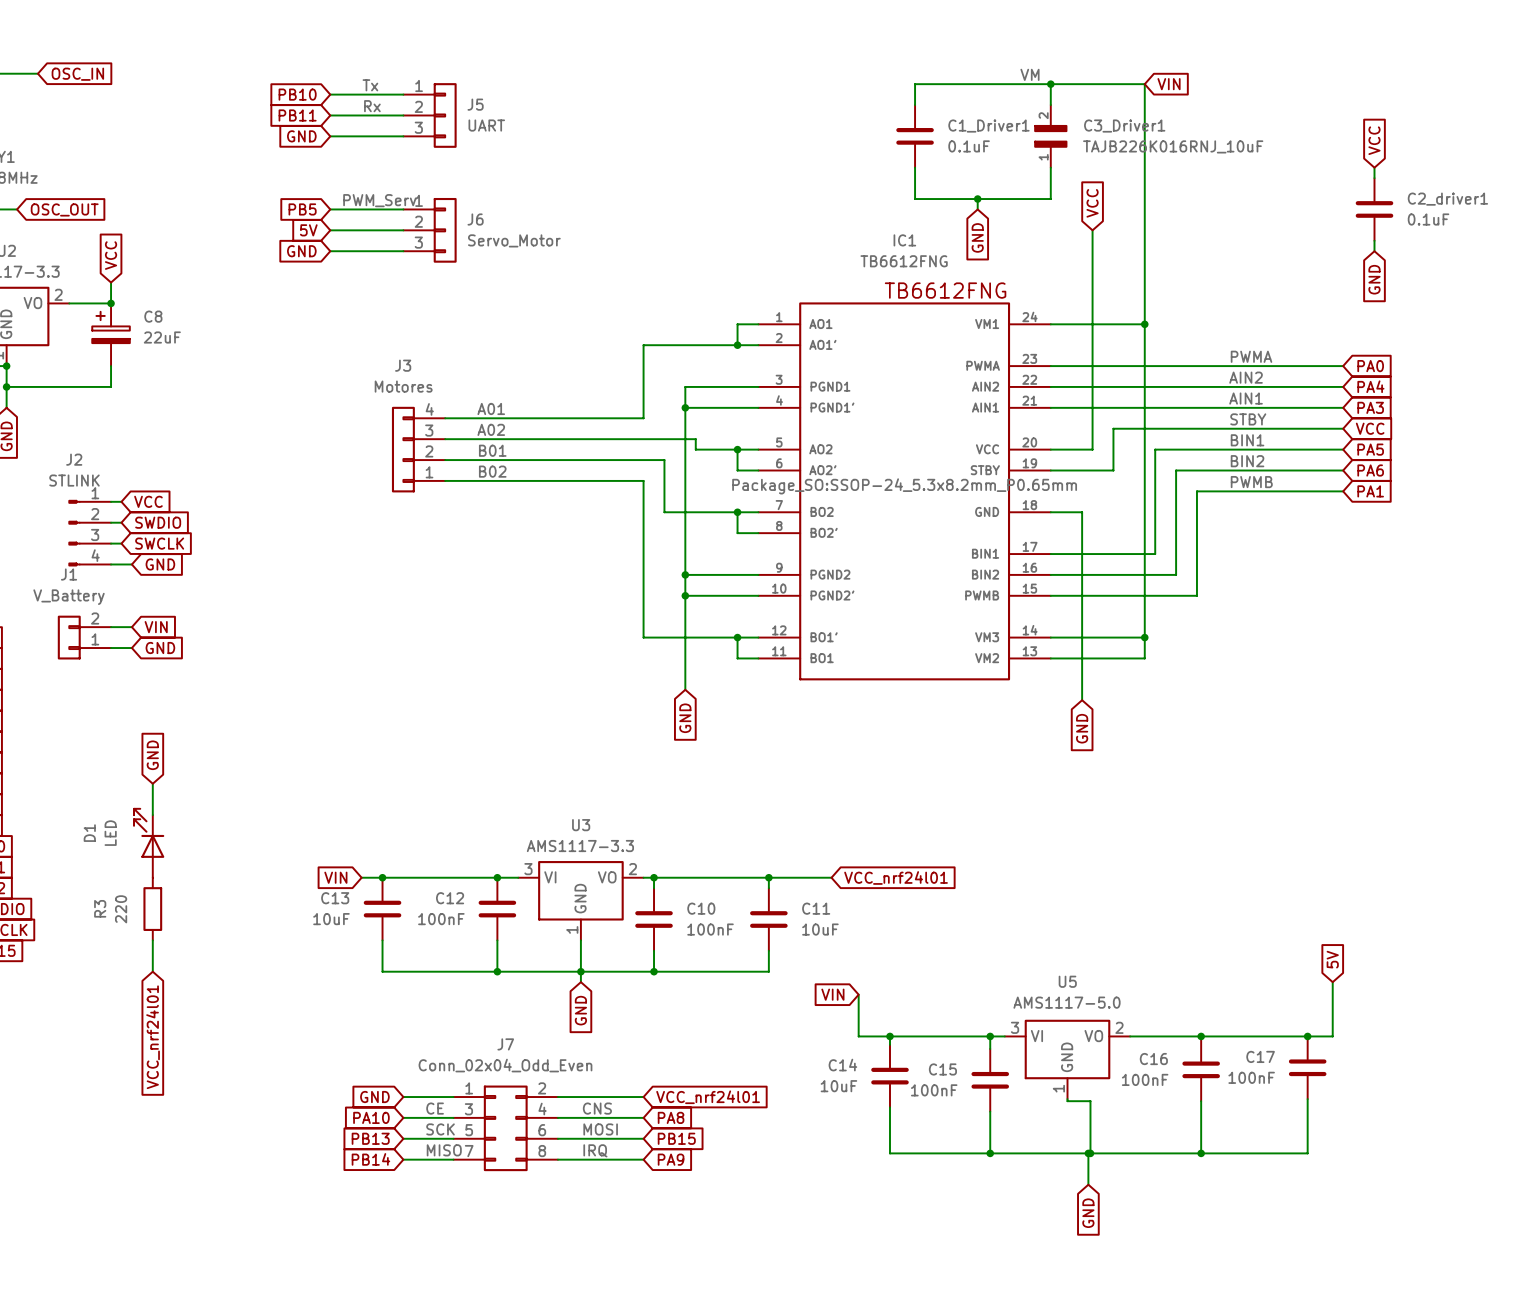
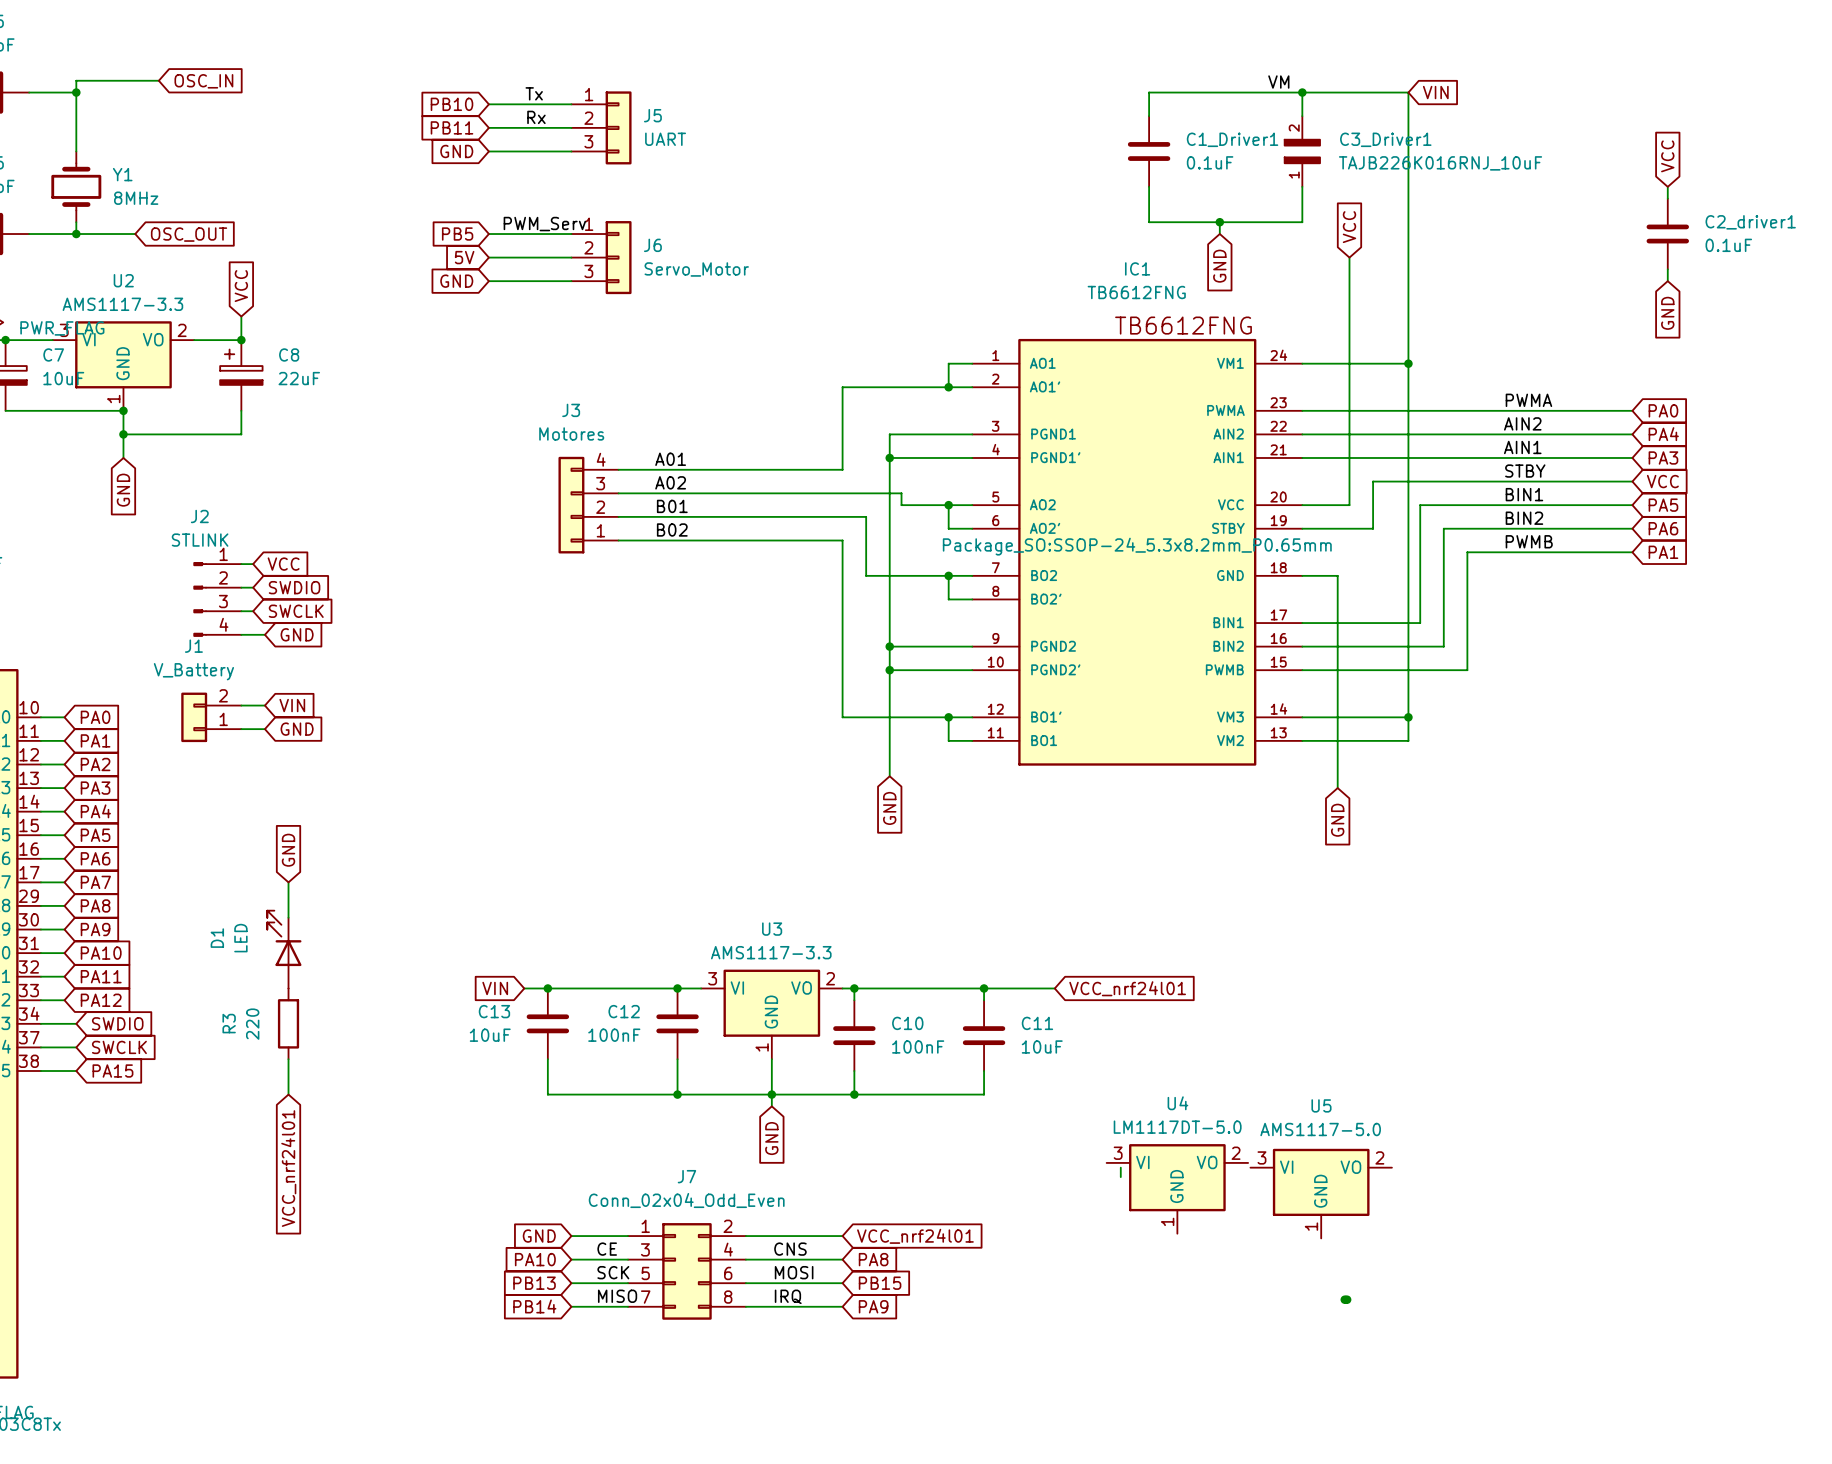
global label: 5V (1332, 959) -> none
wire: (1332, 982) (1332, 1036) (1130, 1036) -> none
global label: VIN (832, 994) -> none
wire: (858, 994) (858, 1036) (1004, 1036) -> none
junction: (889, 1036) -> none
wire: (990, 1036) (990, 1048) -> none
junction: (990, 1036) -> none
junction: (1201, 1036) -> none
junction: (1307, 1036) -> none
U4: none -> LM1117DT-5.0 (1177, 1188)
C17: 100nF (1307, 1067) -> none
C16: 100nF (1201, 1069) -> none
C14: 10uF (889, 1076) -> none
C15: 100nF (990, 1080) -> none
wire: (1067, 1099) (1067, 1101) (1090, 1101) (1090, 1153) -> none
wire: (1307, 1099) (1307, 1153) (889, 1153) (889, 1107) -> none
wire: (1201, 1101) (1201, 1153) -> none
wire: (990, 1111) (990, 1153) -> none
junction: (990, 1153) -> none
wire: (1088, 1153) (1088, 1184) -> none
junction: (1201, 1153) -> none
global label: GND (1088, 1213) -> none

